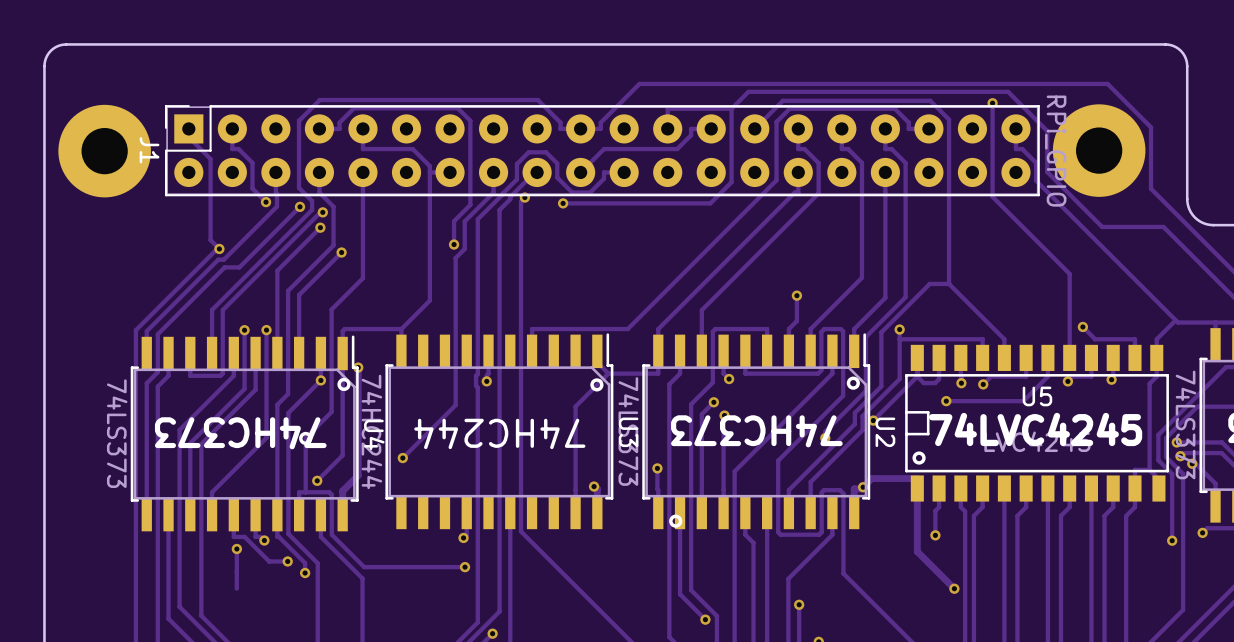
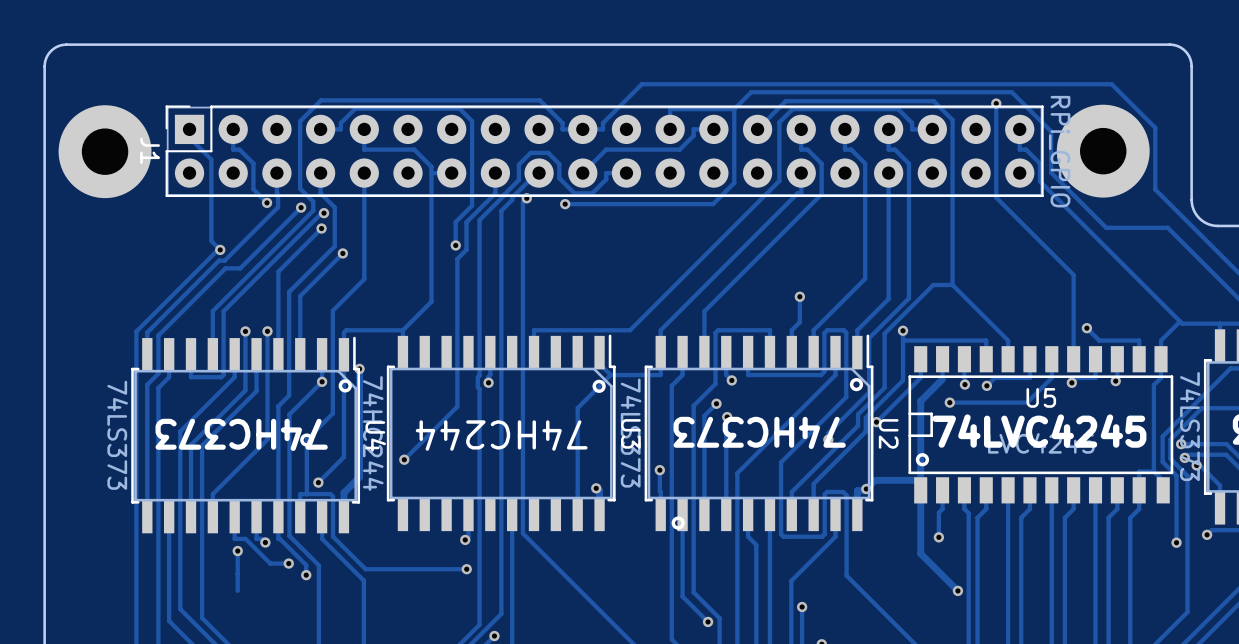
track: (917, 376) (923, 383) (935, 383) (939, 377) -> (920, 480) (920, 401) (942, 379)

